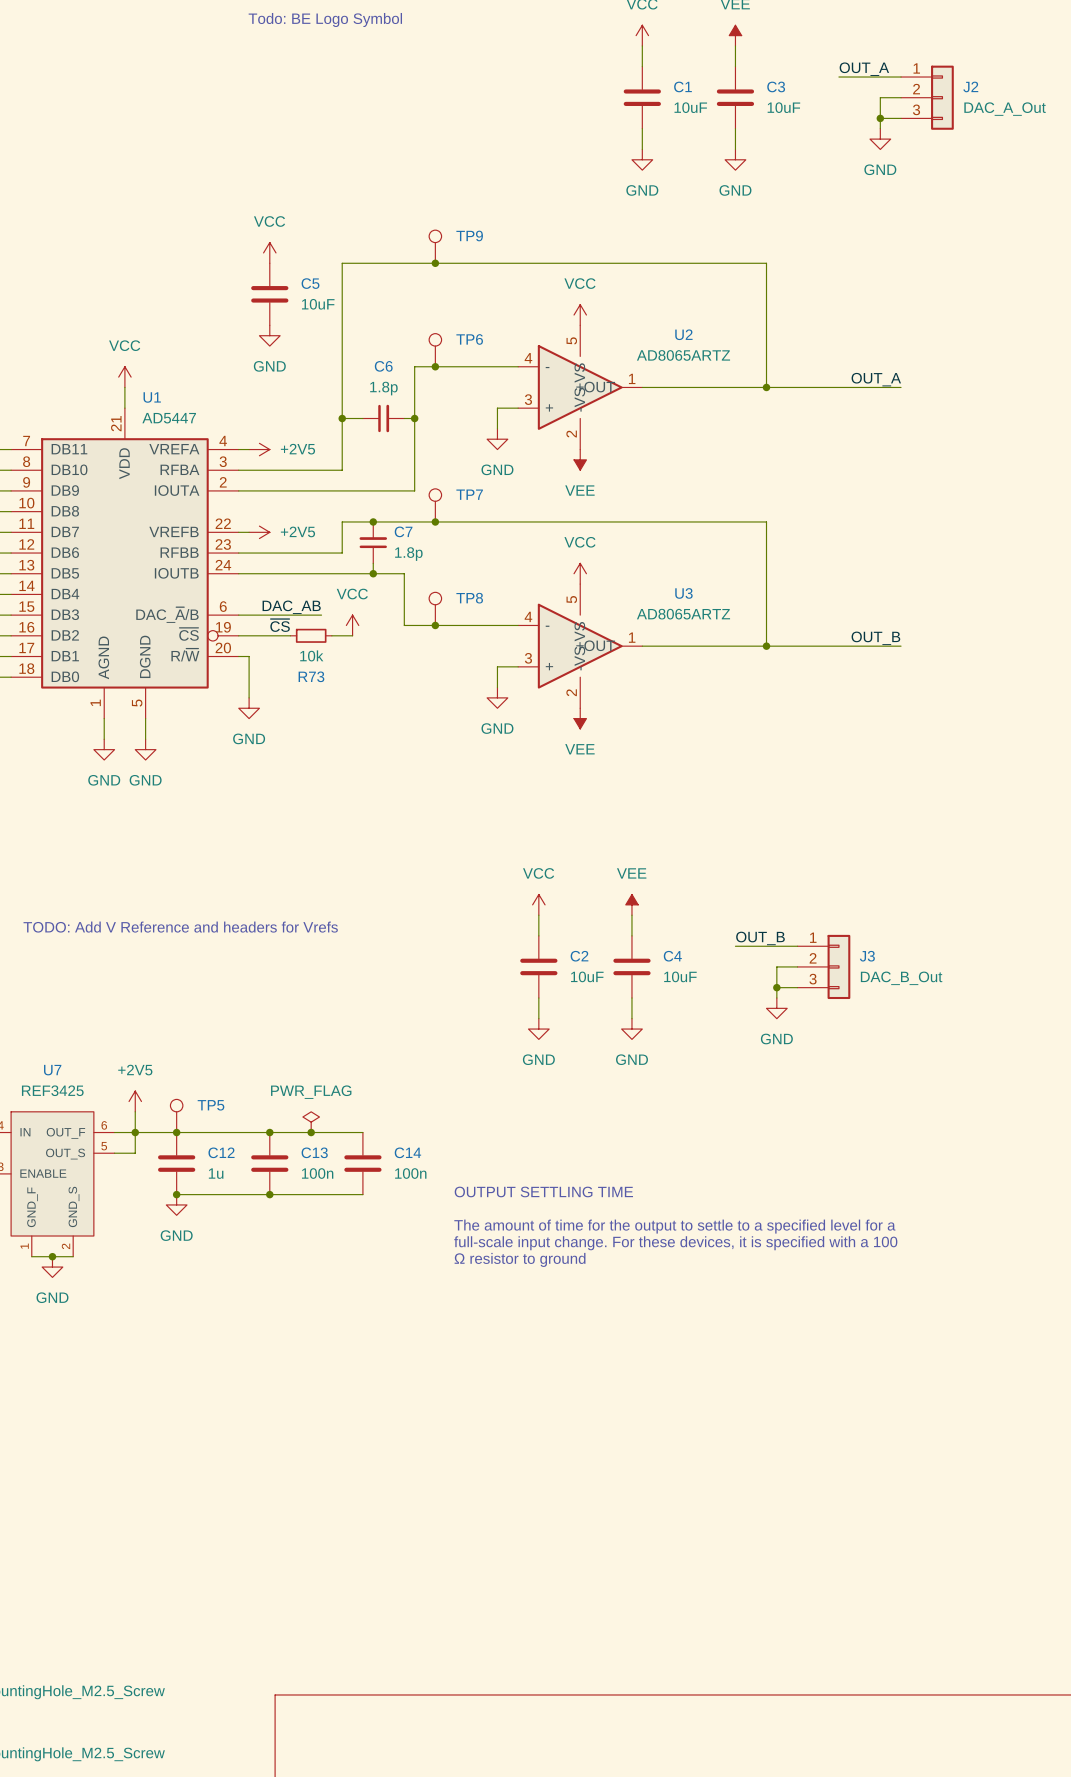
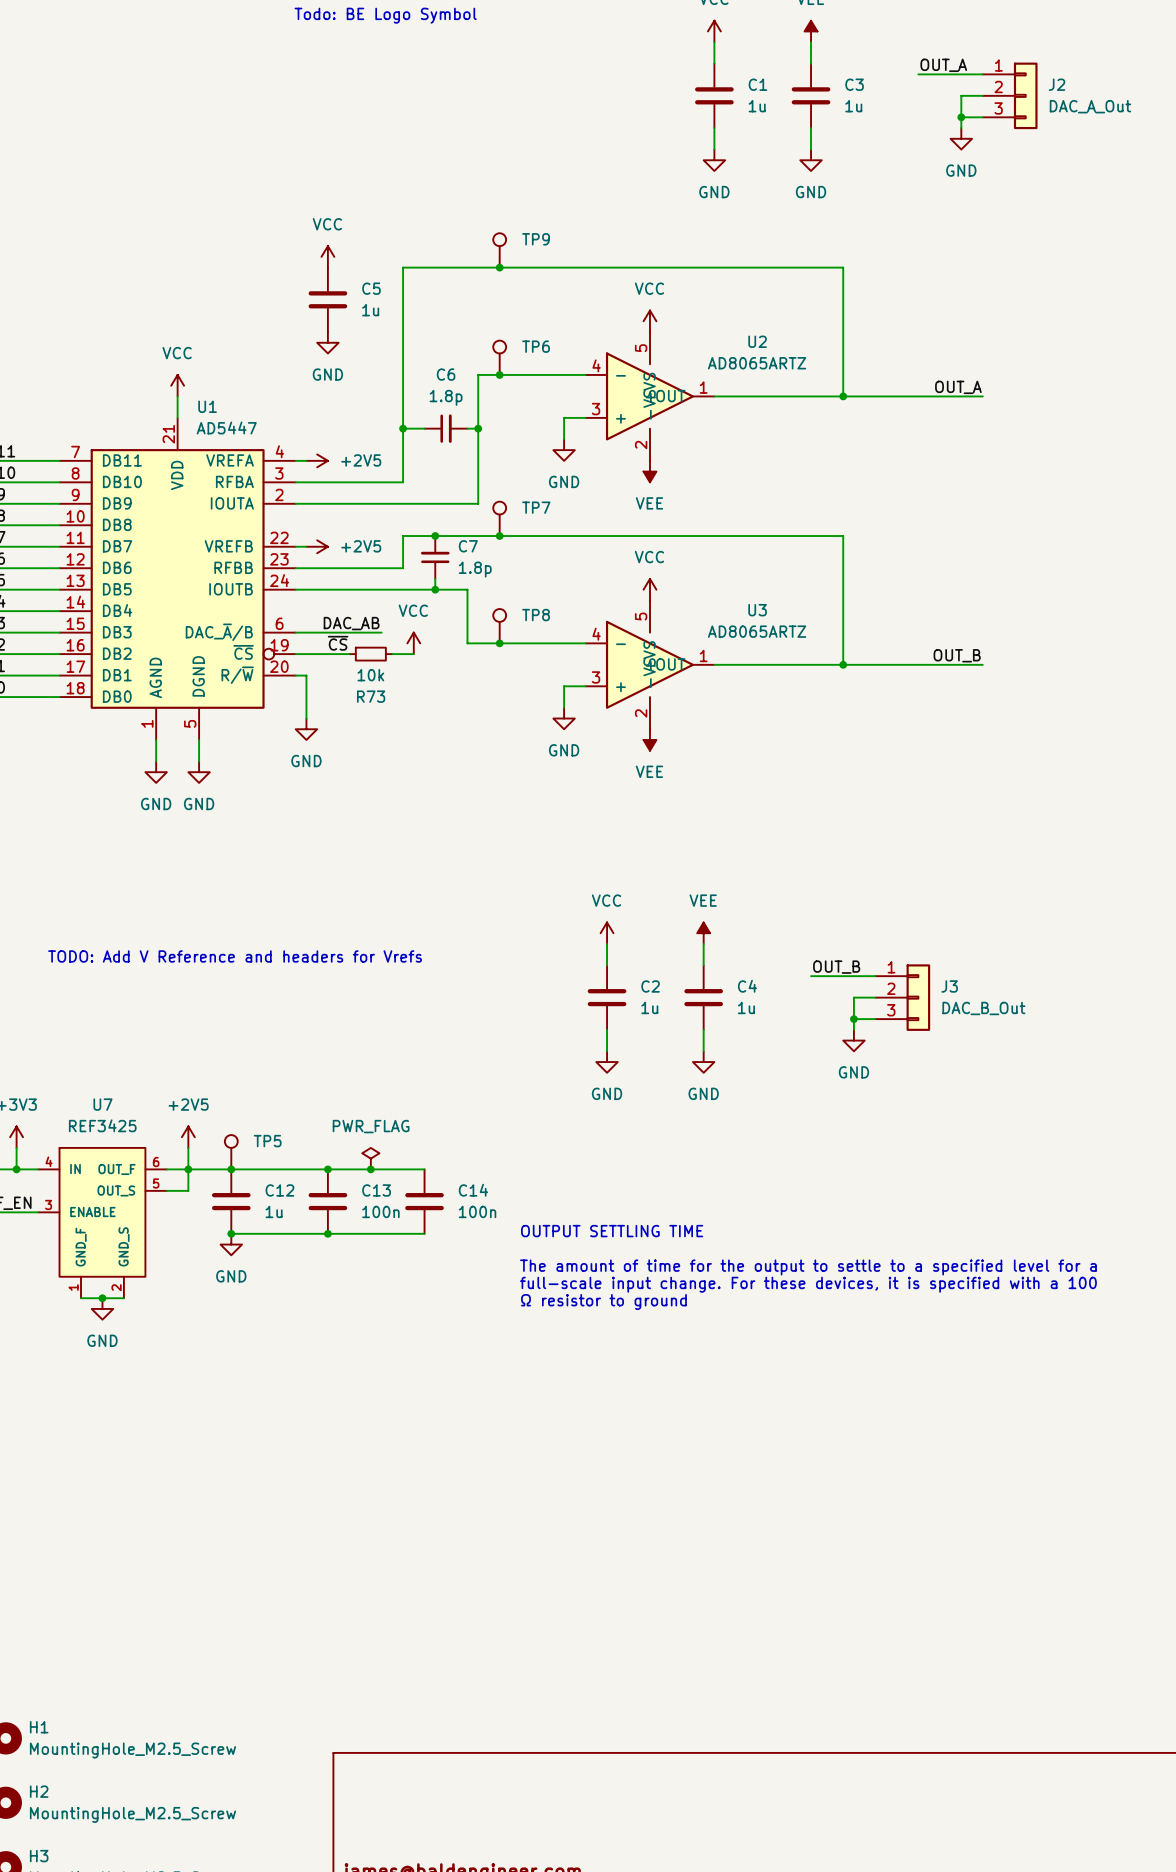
C1 value: 10uF (690, 107) -> 1u (757, 106)
C3 value: 10uF (783, 107) -> 1u (853, 106)
C5 value: 10uF (318, 304) -> 1u (370, 310)
C2 value: 10uF (587, 976) -> 1u (649, 1007)
C4 value: 10uF (680, 976) -> 1u (746, 1007)

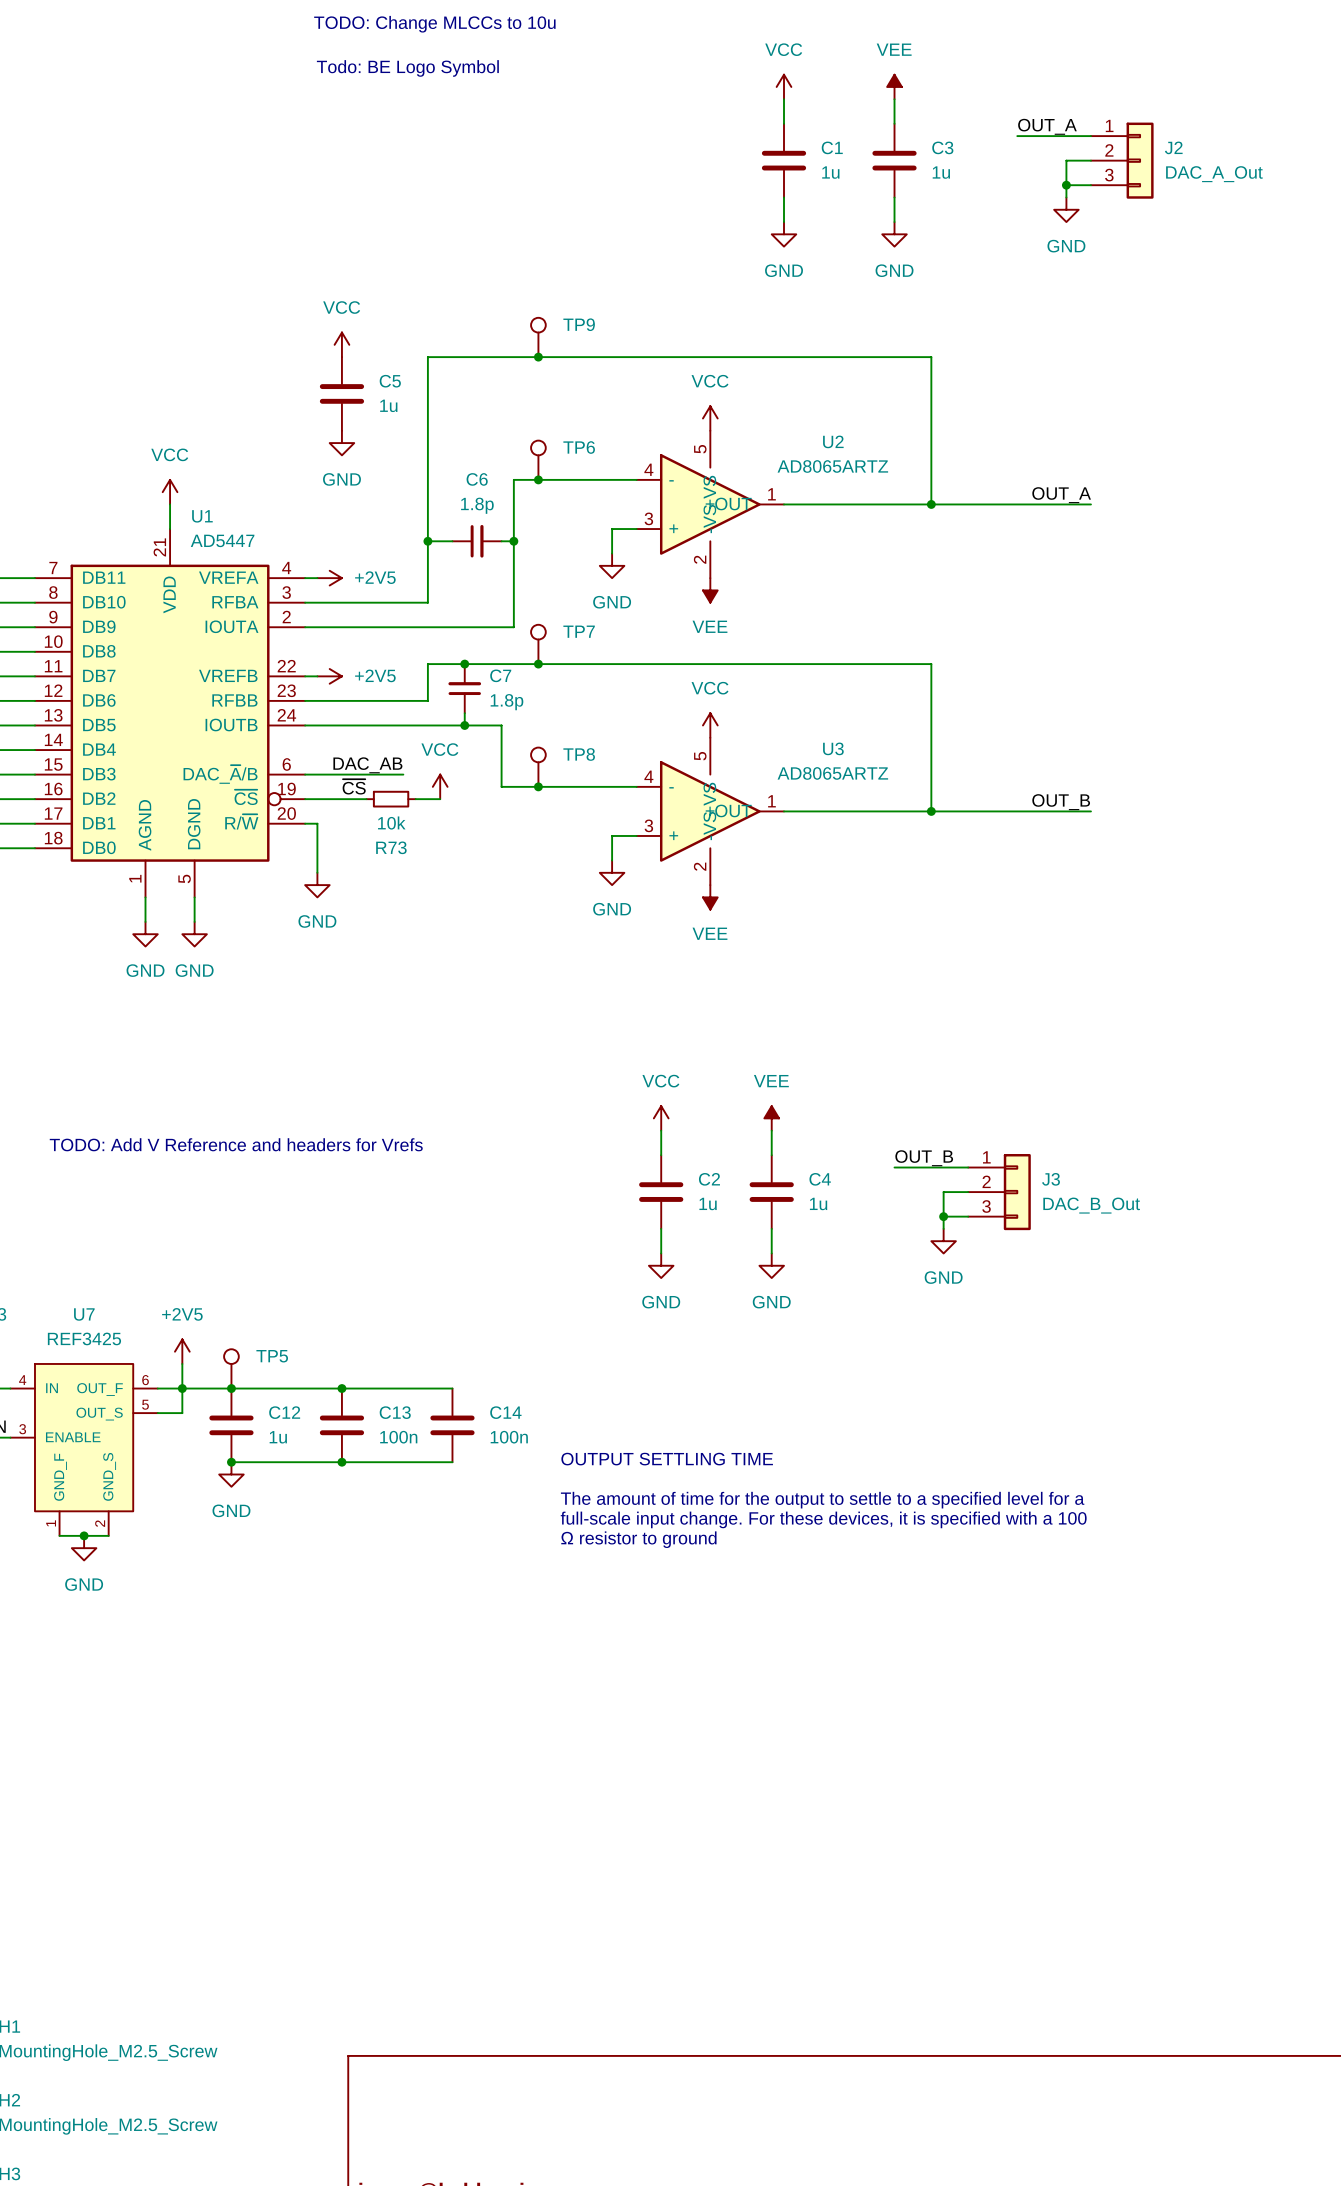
power symbol: PWR_FLAG (370, 1158) -> none
junction: (370, 1169) -> none

